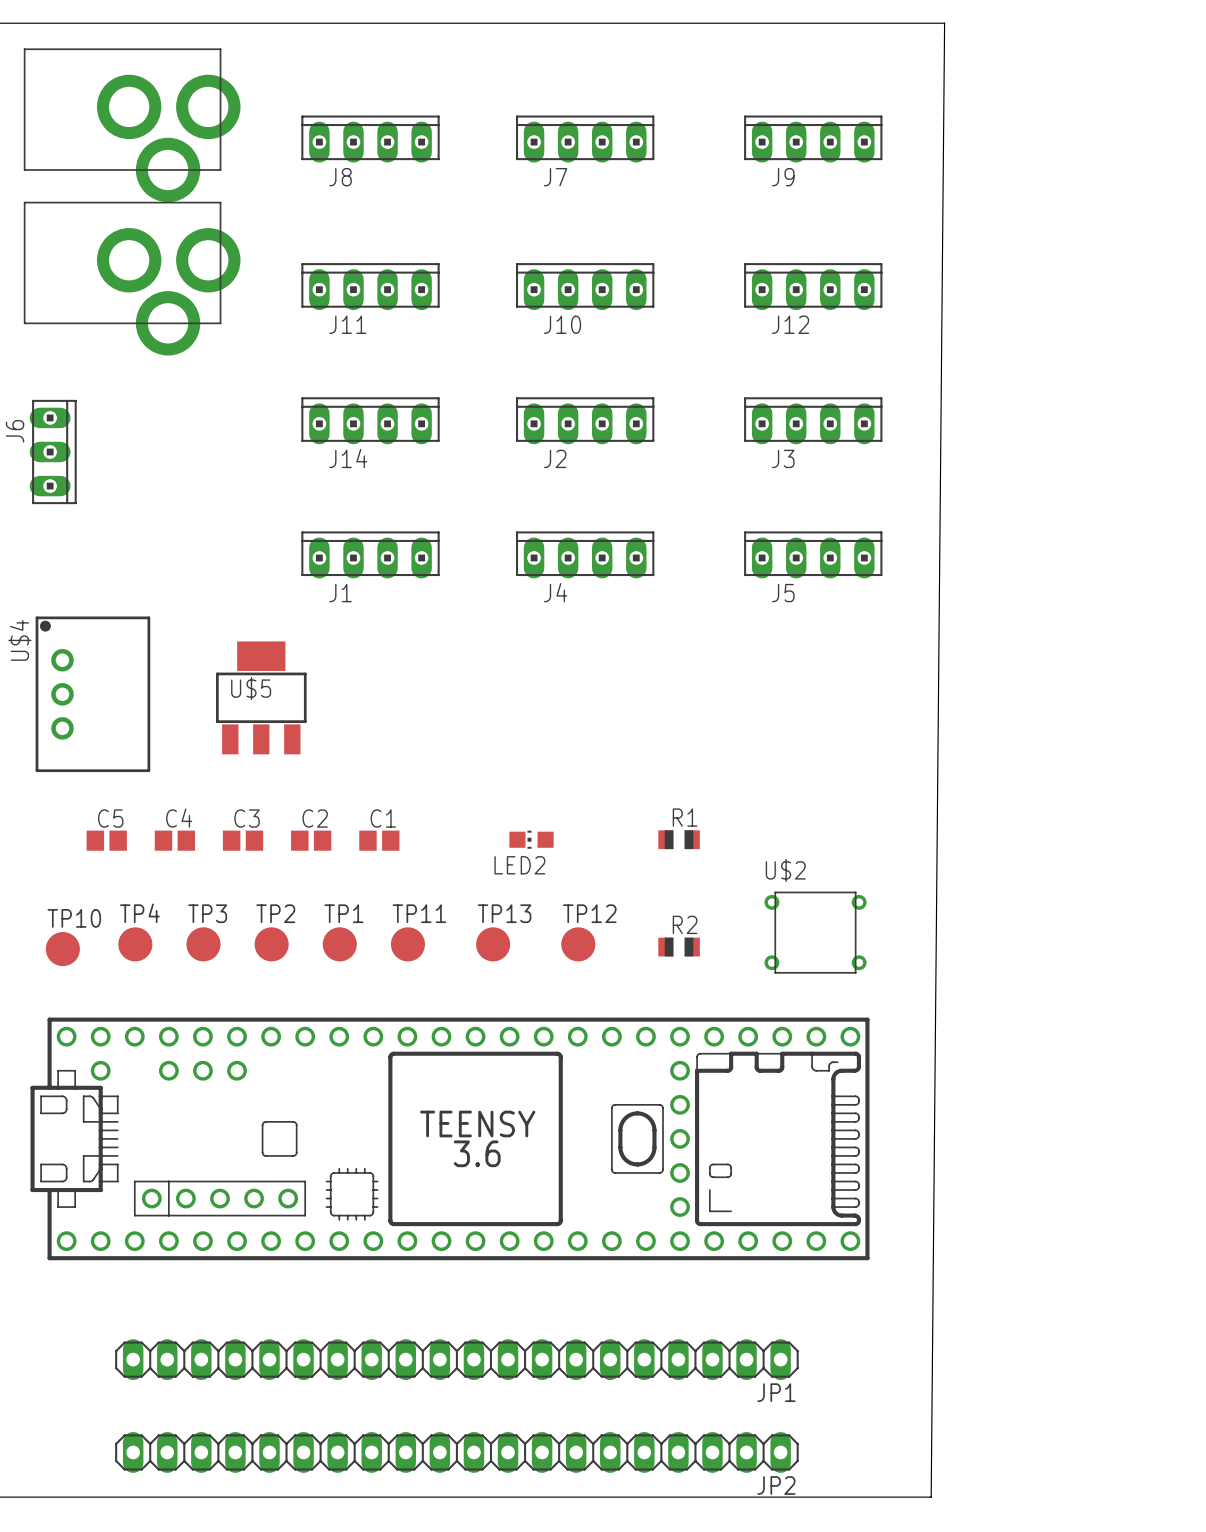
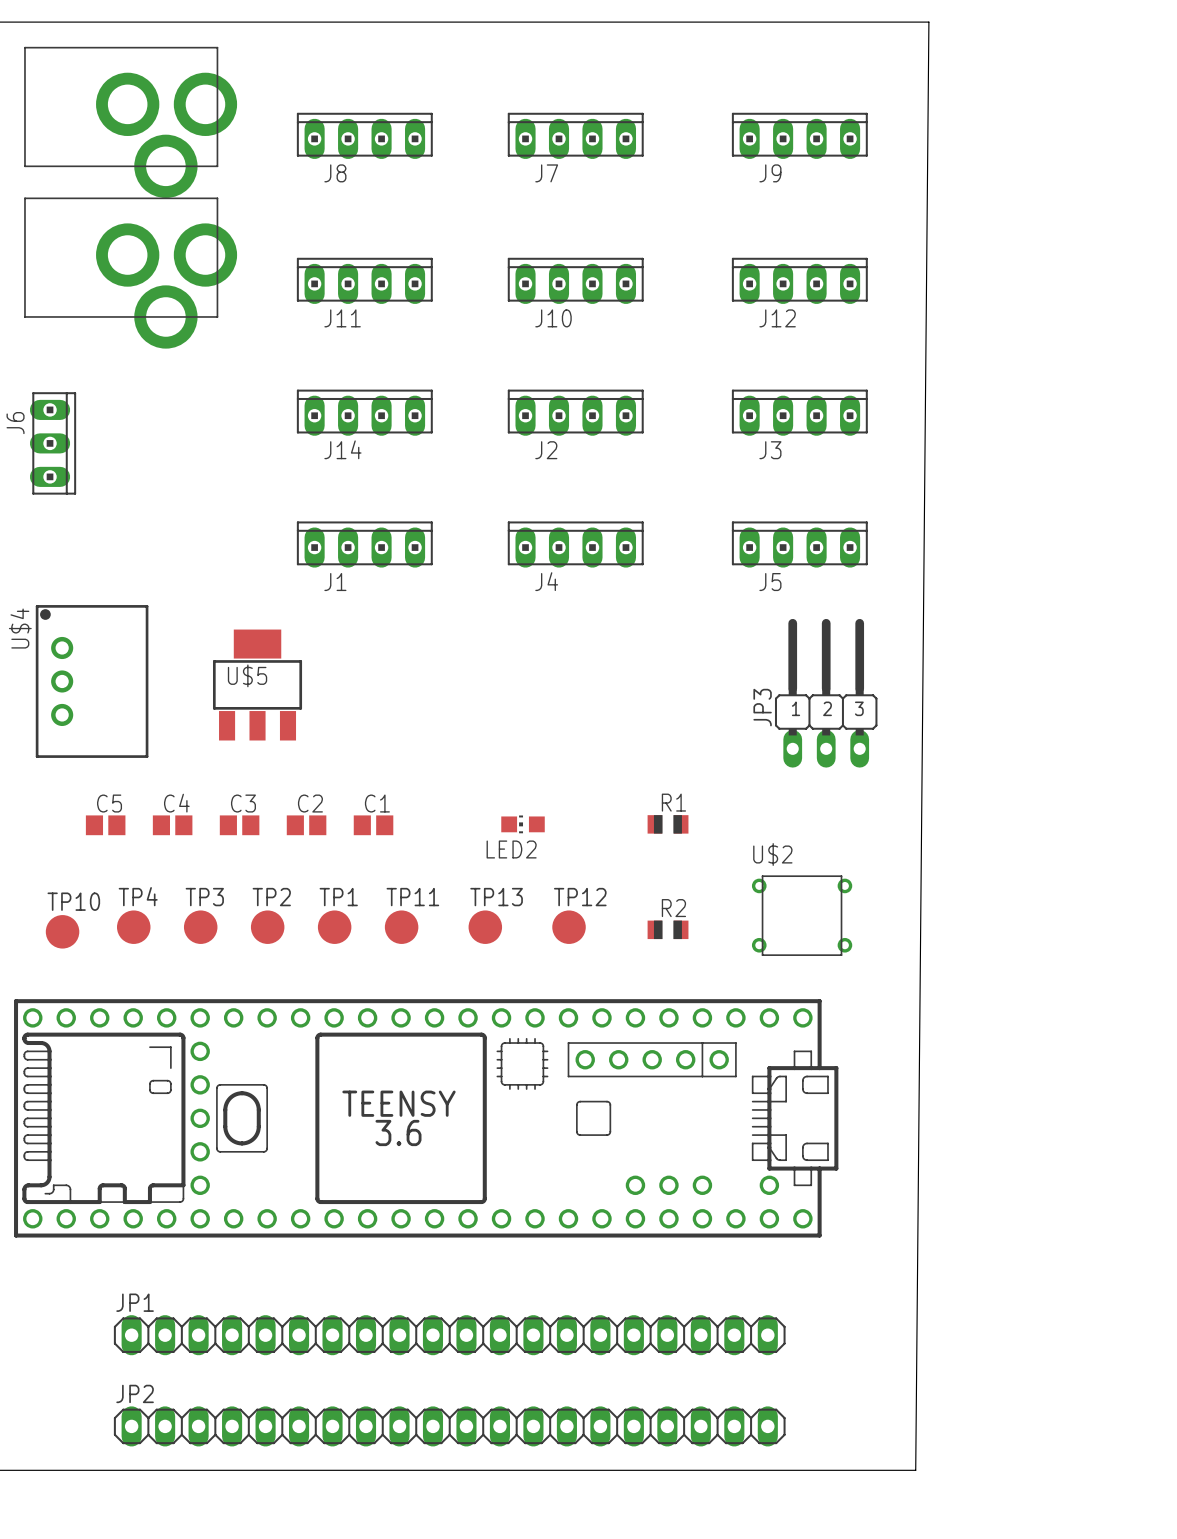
JP3: none -> (826, 693)
part: none -> (426, 1118)
part: (450, 1138) -> none
JP1 name position: JP1 (776, 1392) -> JP1 (135, 1302)
JP2 name position: JP2 (776, 1485) -> JP2 (135, 1393)

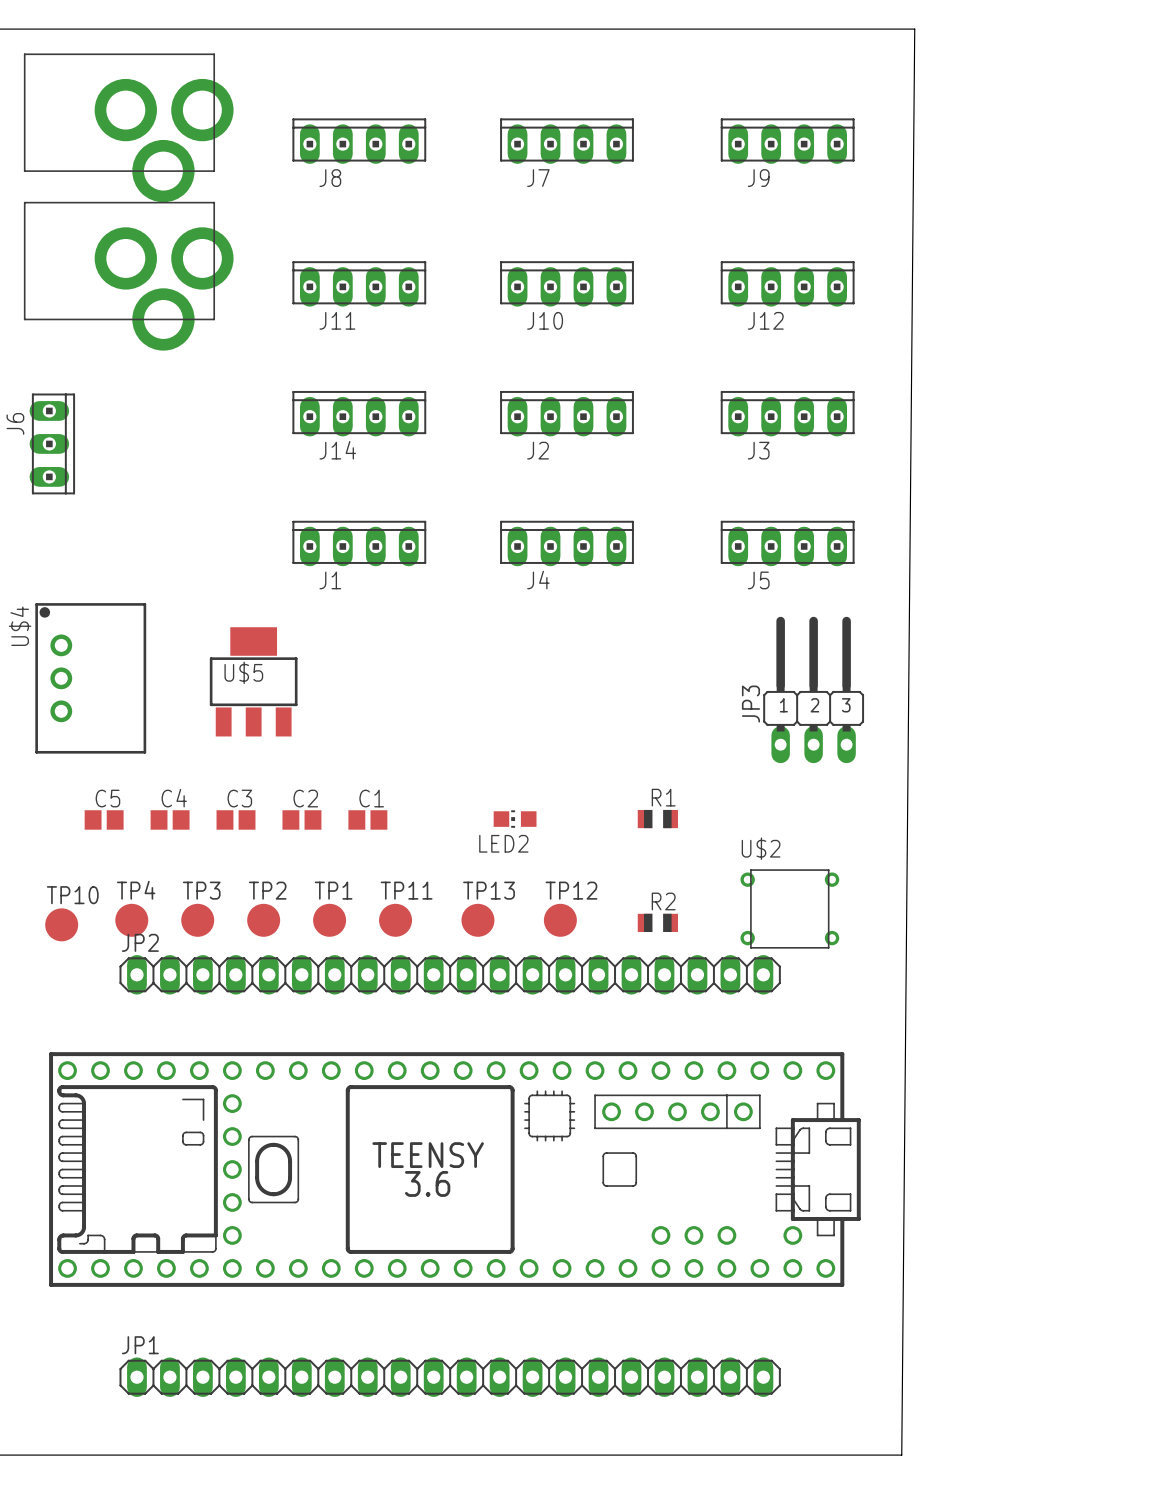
part: (426, 1118) -> none
part: none -> (454, 1169)
JP1 position: (449, 1335) -> (450, 1377)
JP2 position: (449, 1426) -> (450, 974)

